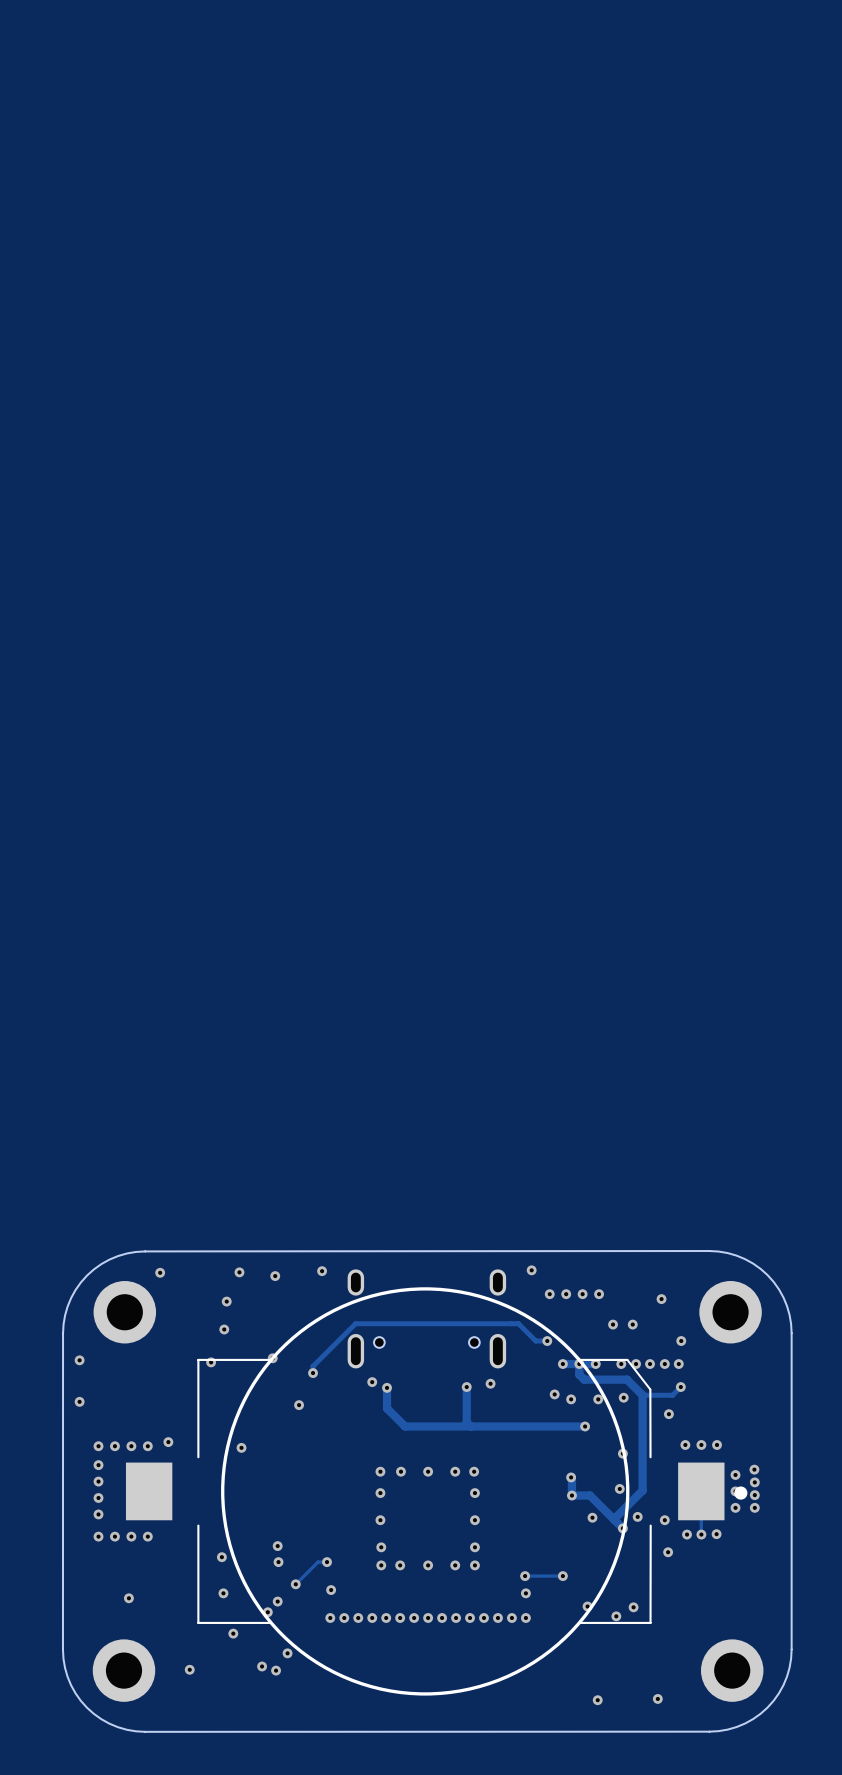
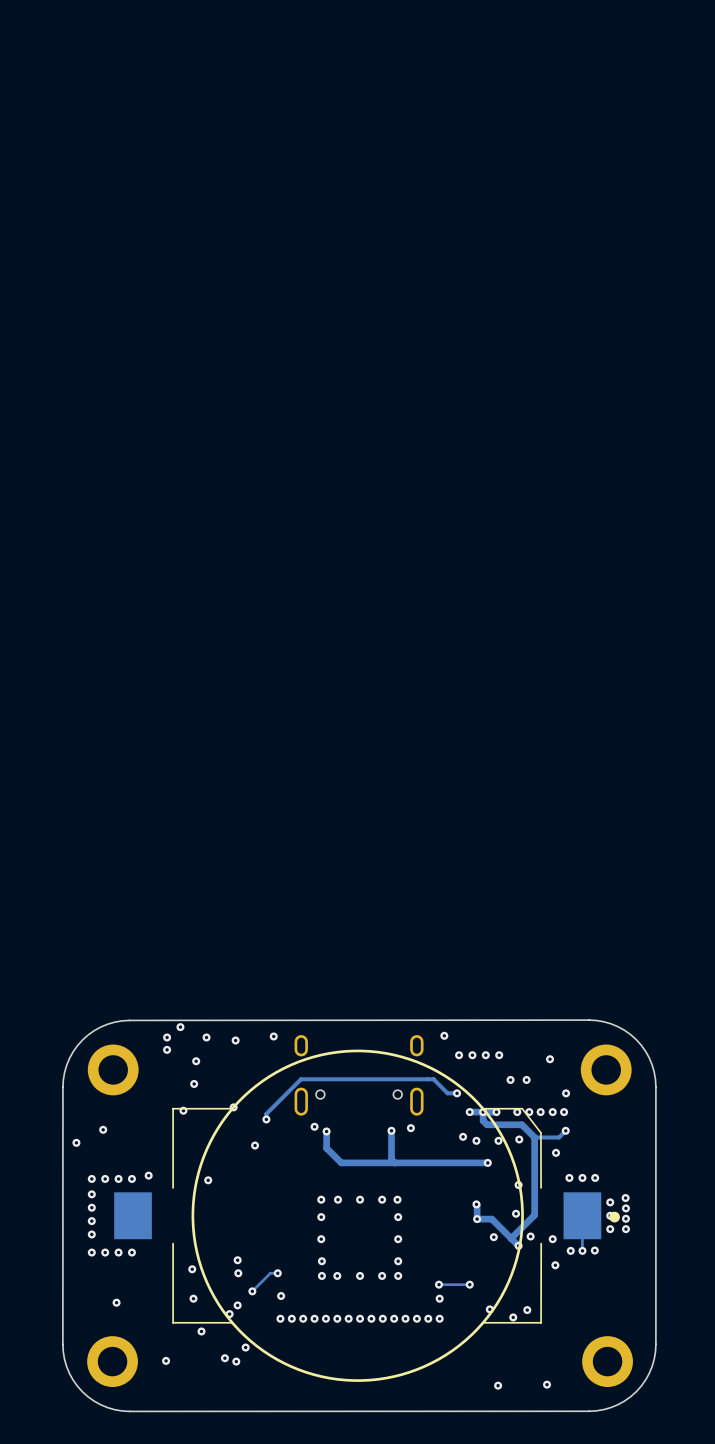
via: none -> (180, 1027)
via: (160, 1272) -> none
via: none -> (167, 1037)
via: none -> (167, 1049)
via position: (79, 1360) -> (103, 1129)

